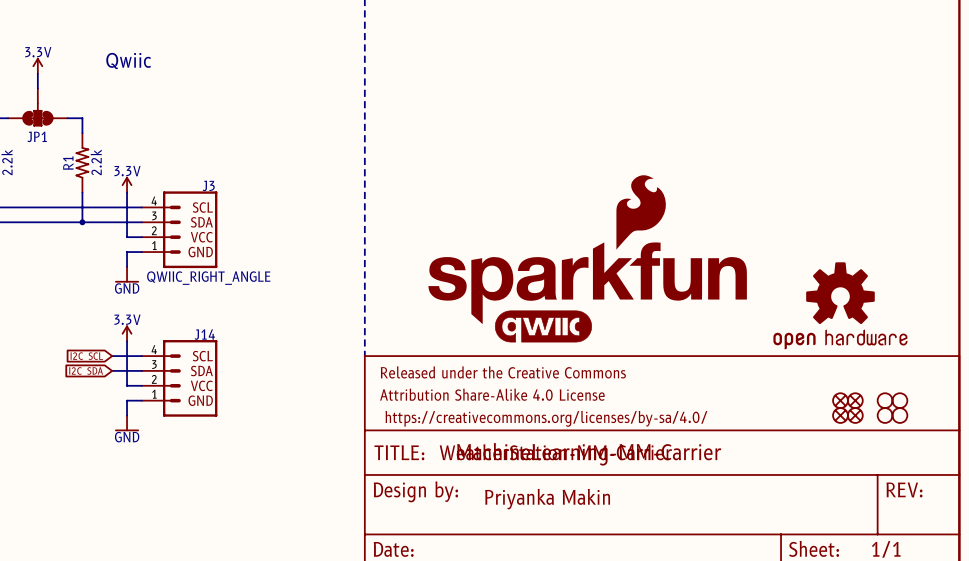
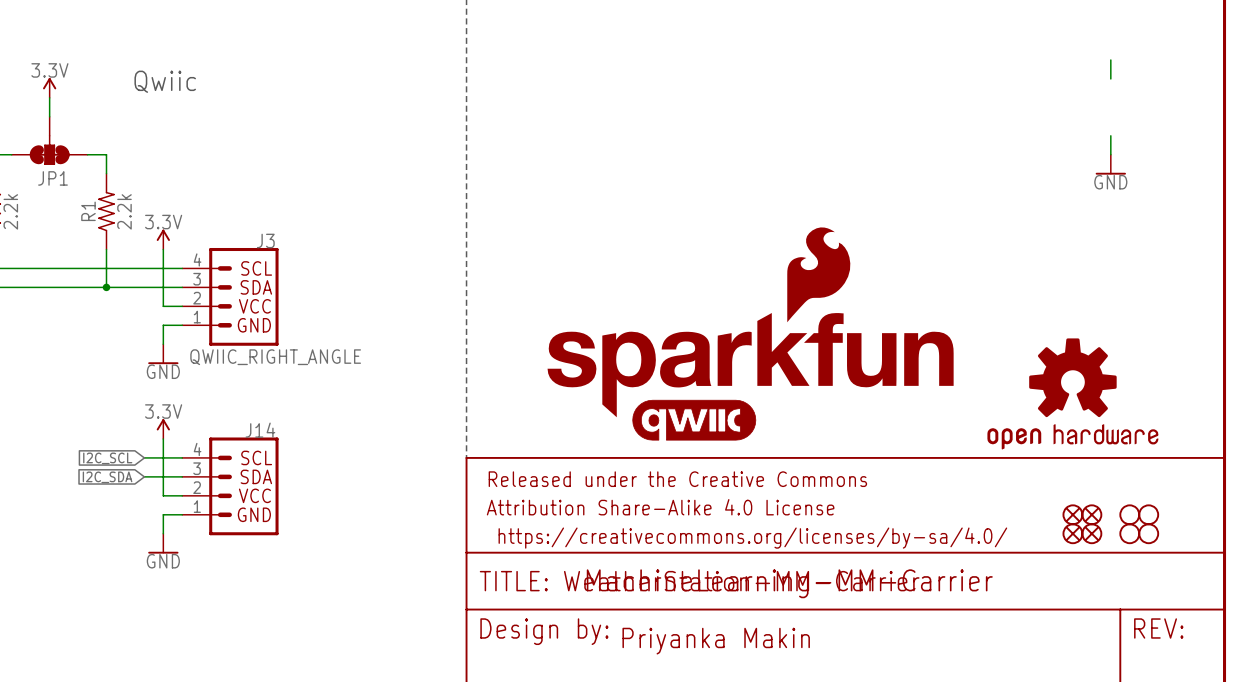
wire: none -> (1110, 60) (1110, 78)
wire: none -> (1110, 135) (1110, 154)
power symbol: none -> GND (1110, 164)

